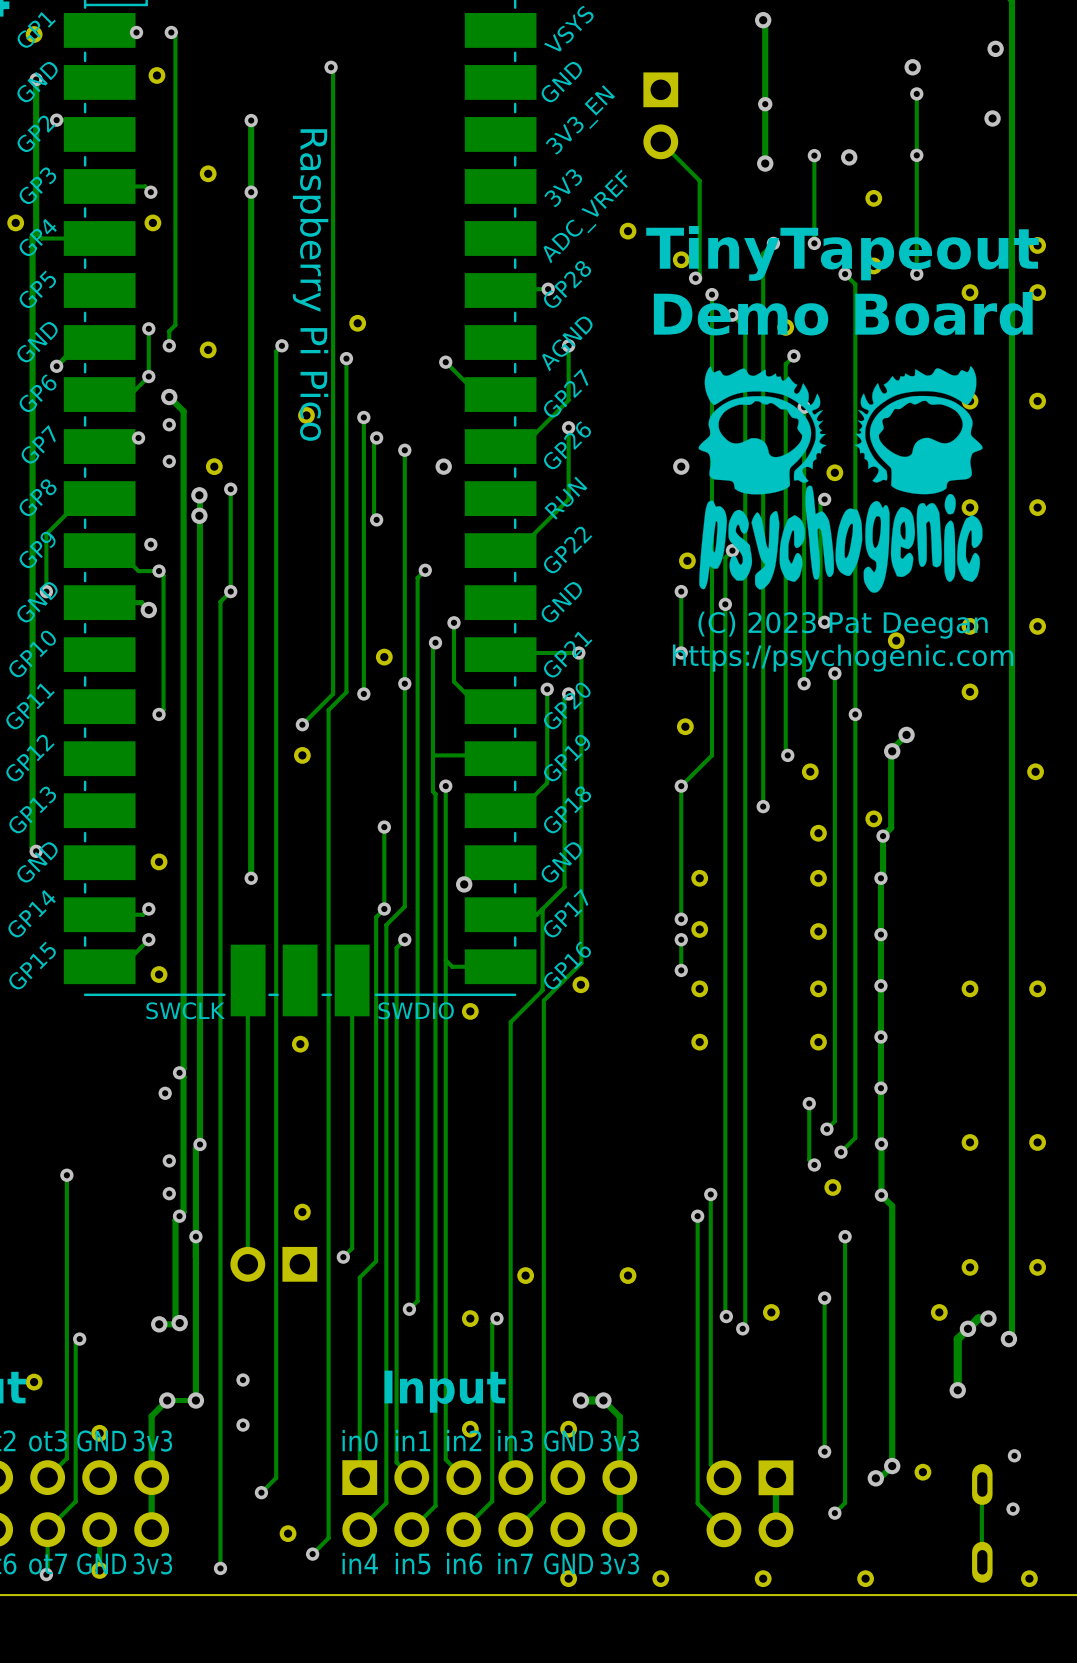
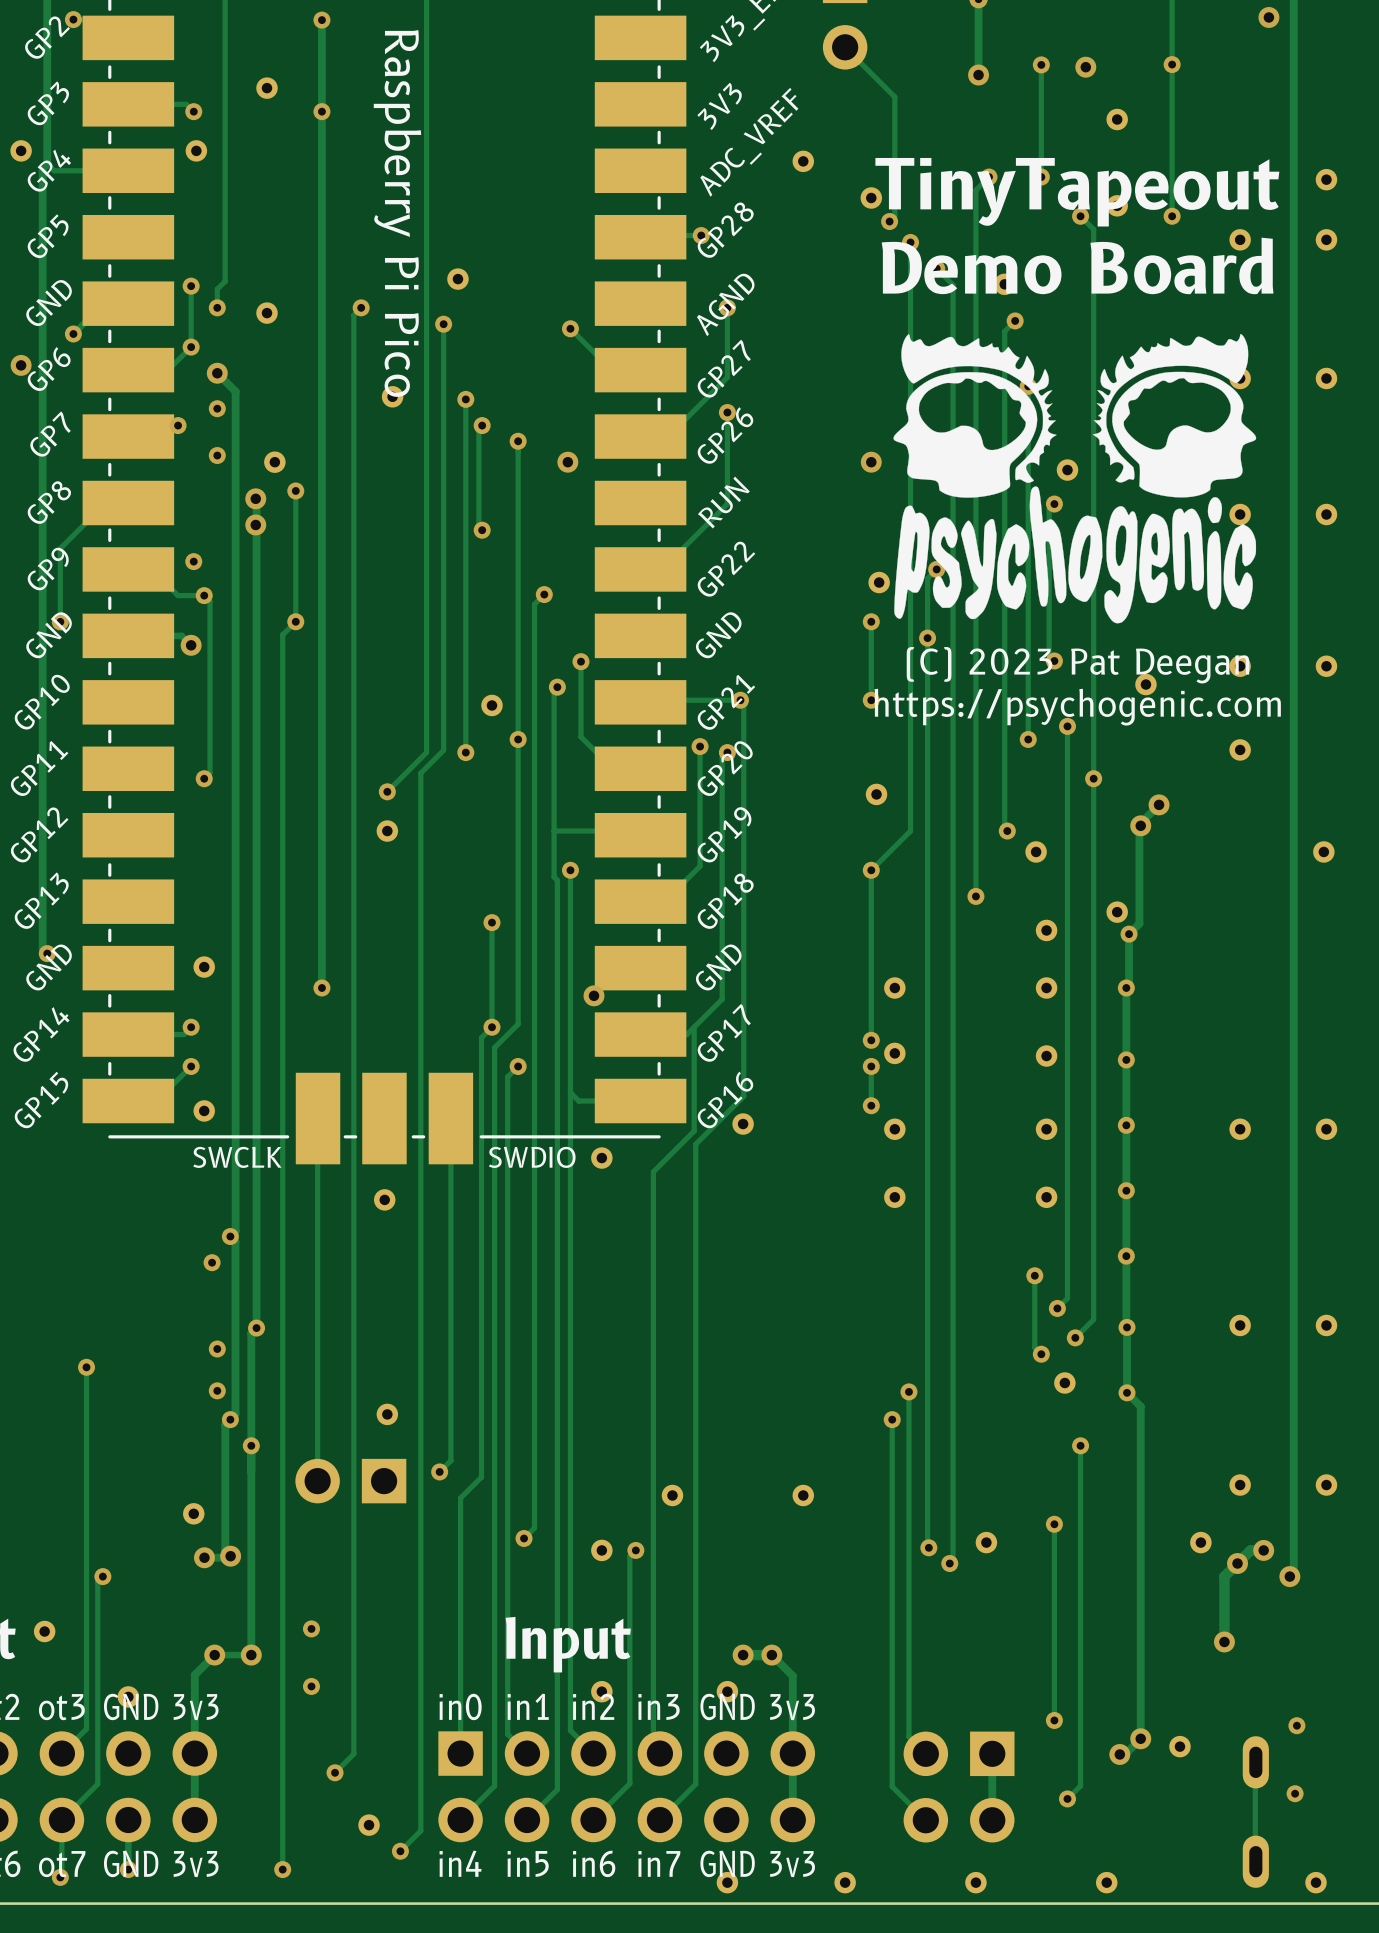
via: none -> (21, 365)
via: none -> (128, 1869)
part position: (99, 1570) -> (193, 1513)

